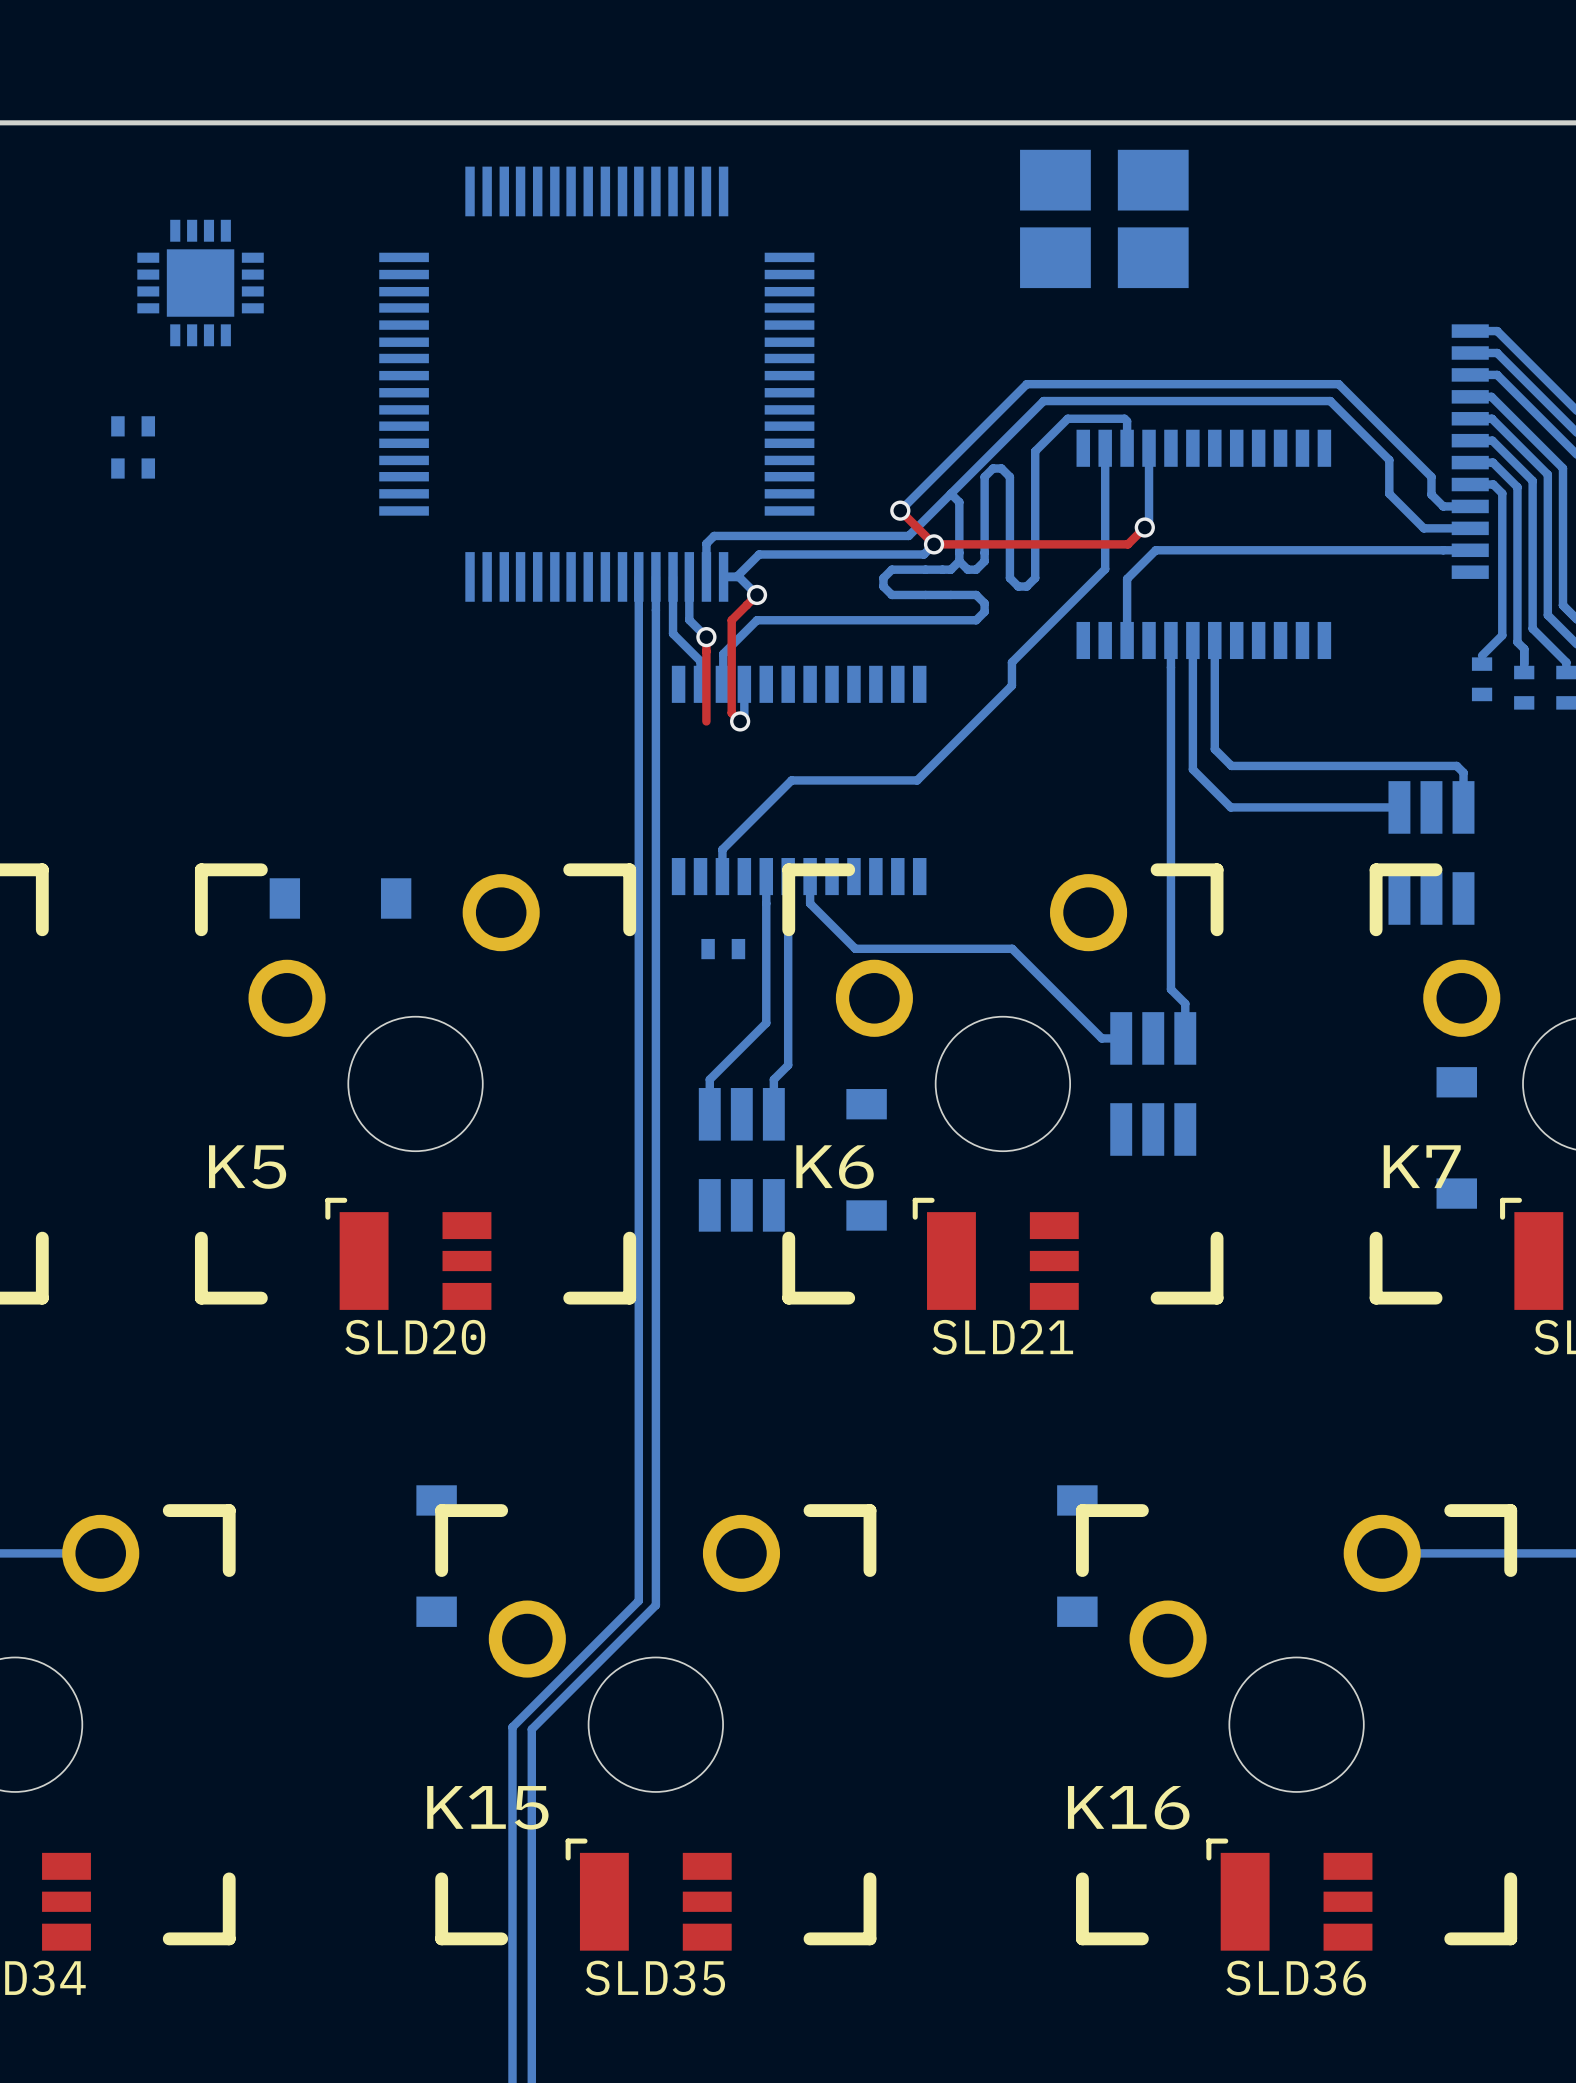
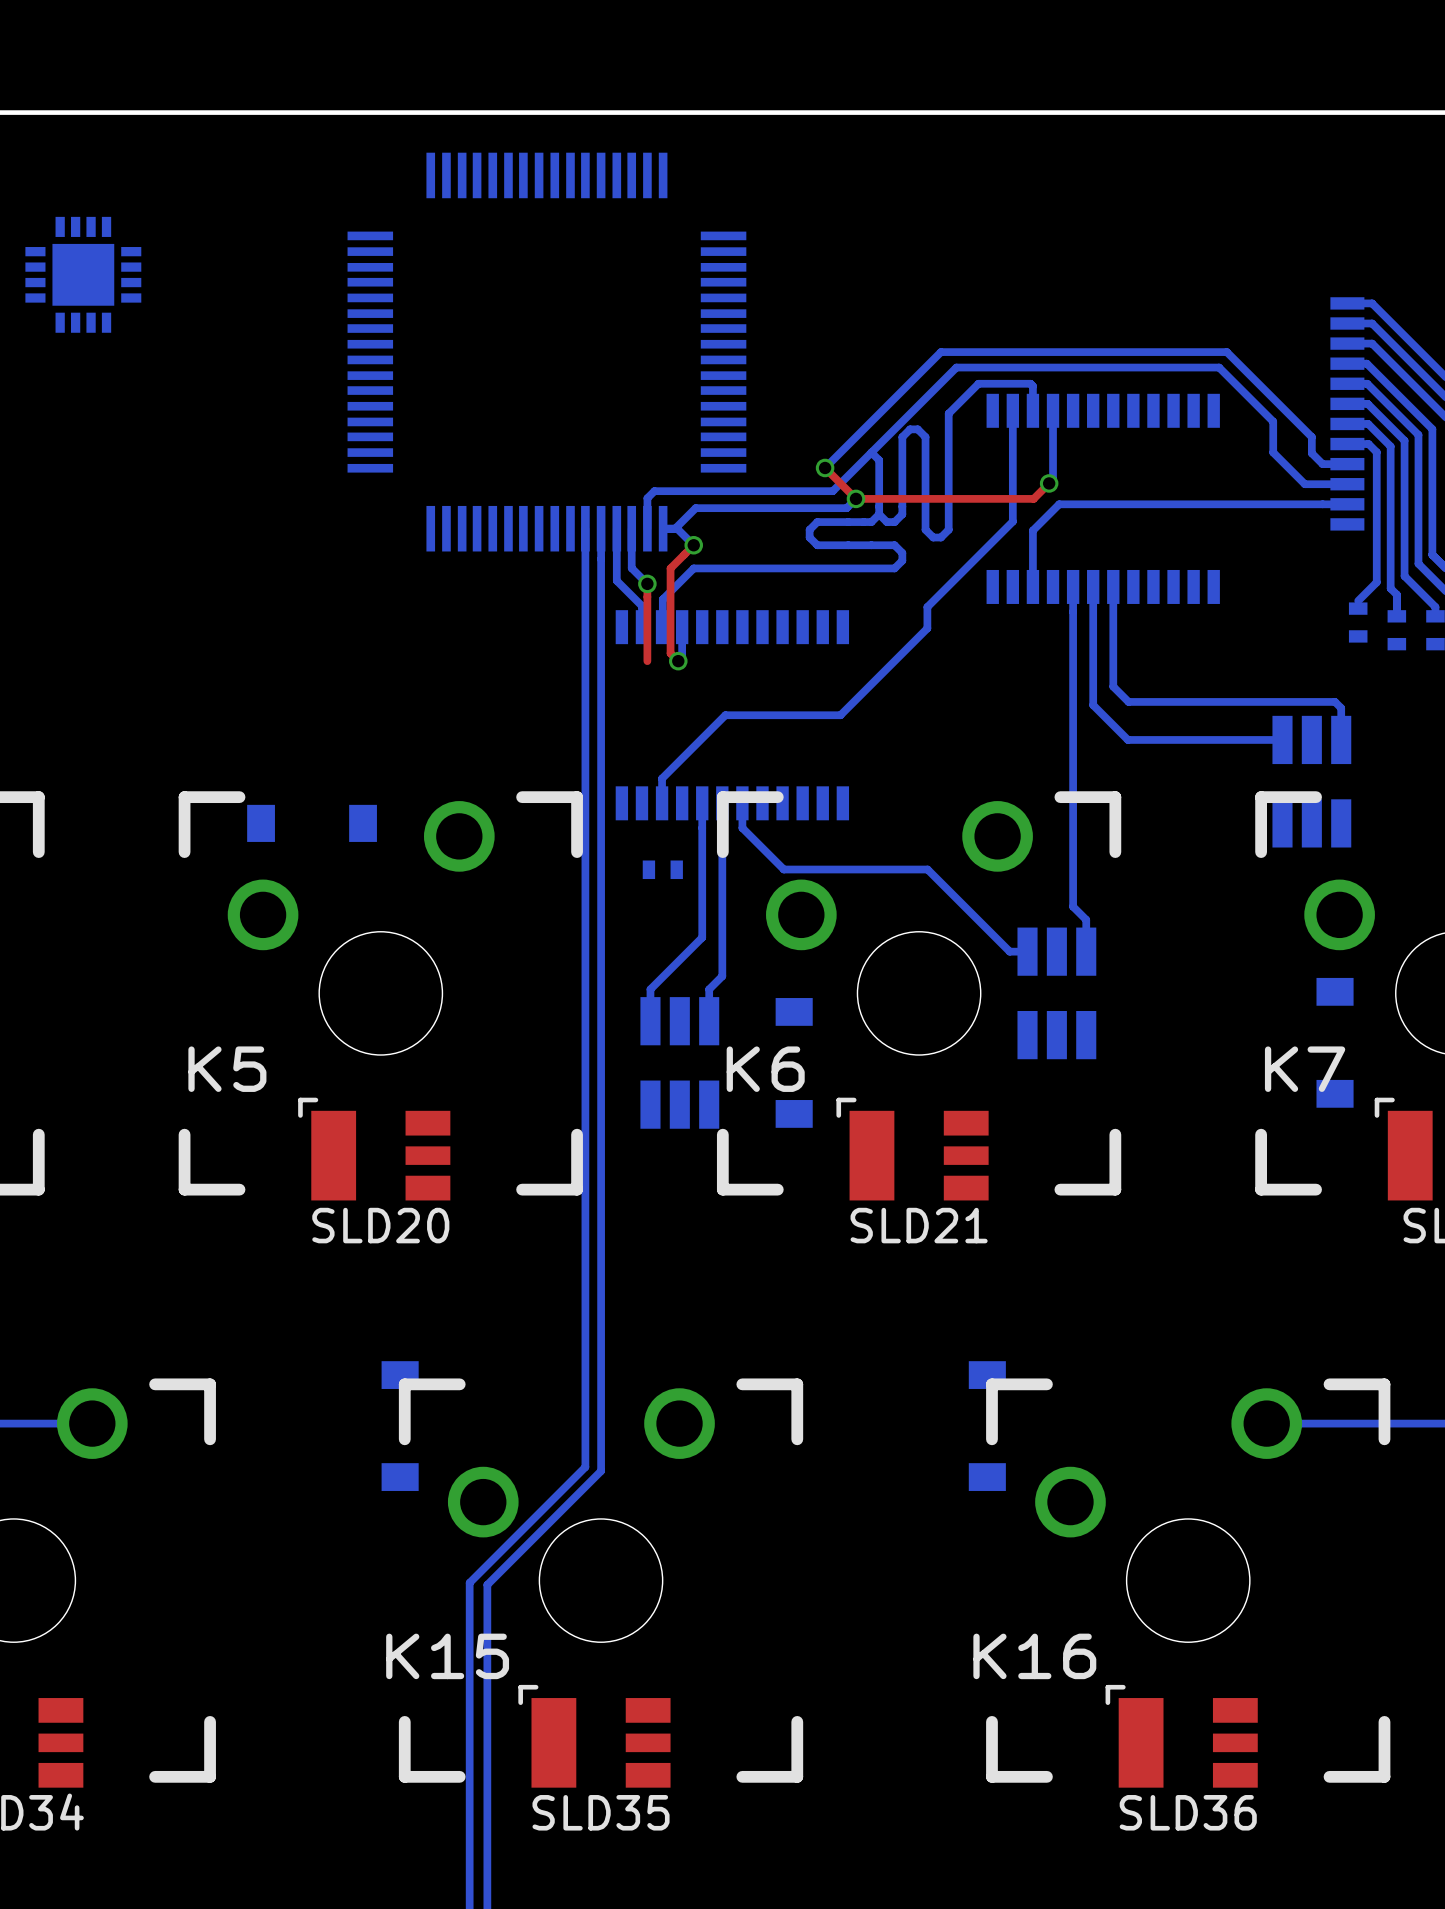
part: (1104, 218) -> none
part position: (200, 283) -> (83, 274)
part: (133, 426) -> none
part: (133, 468) -> none

